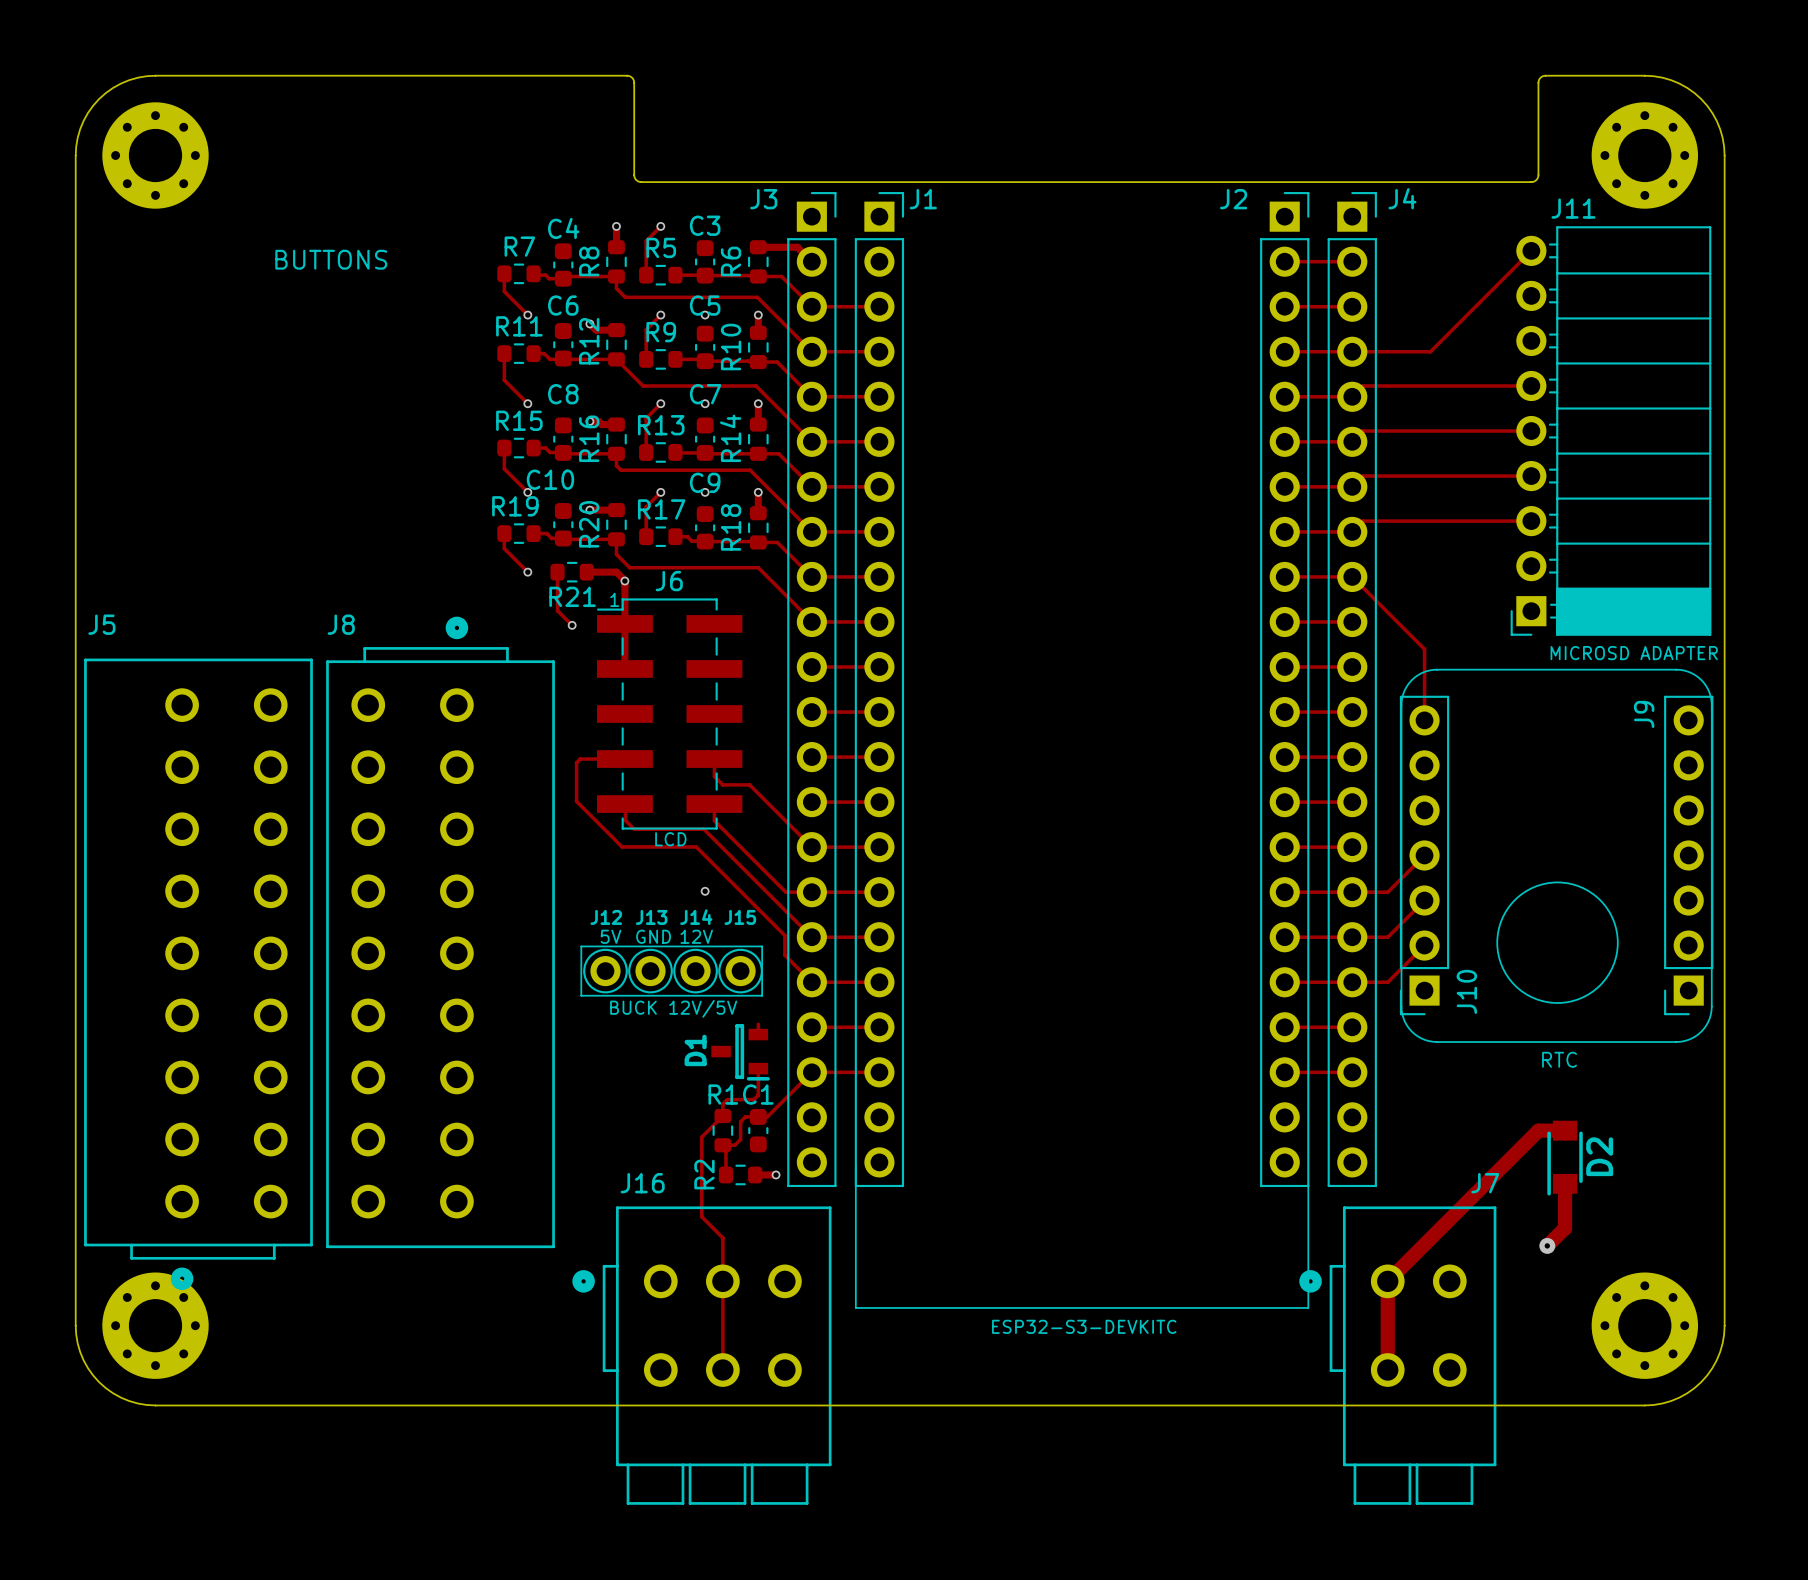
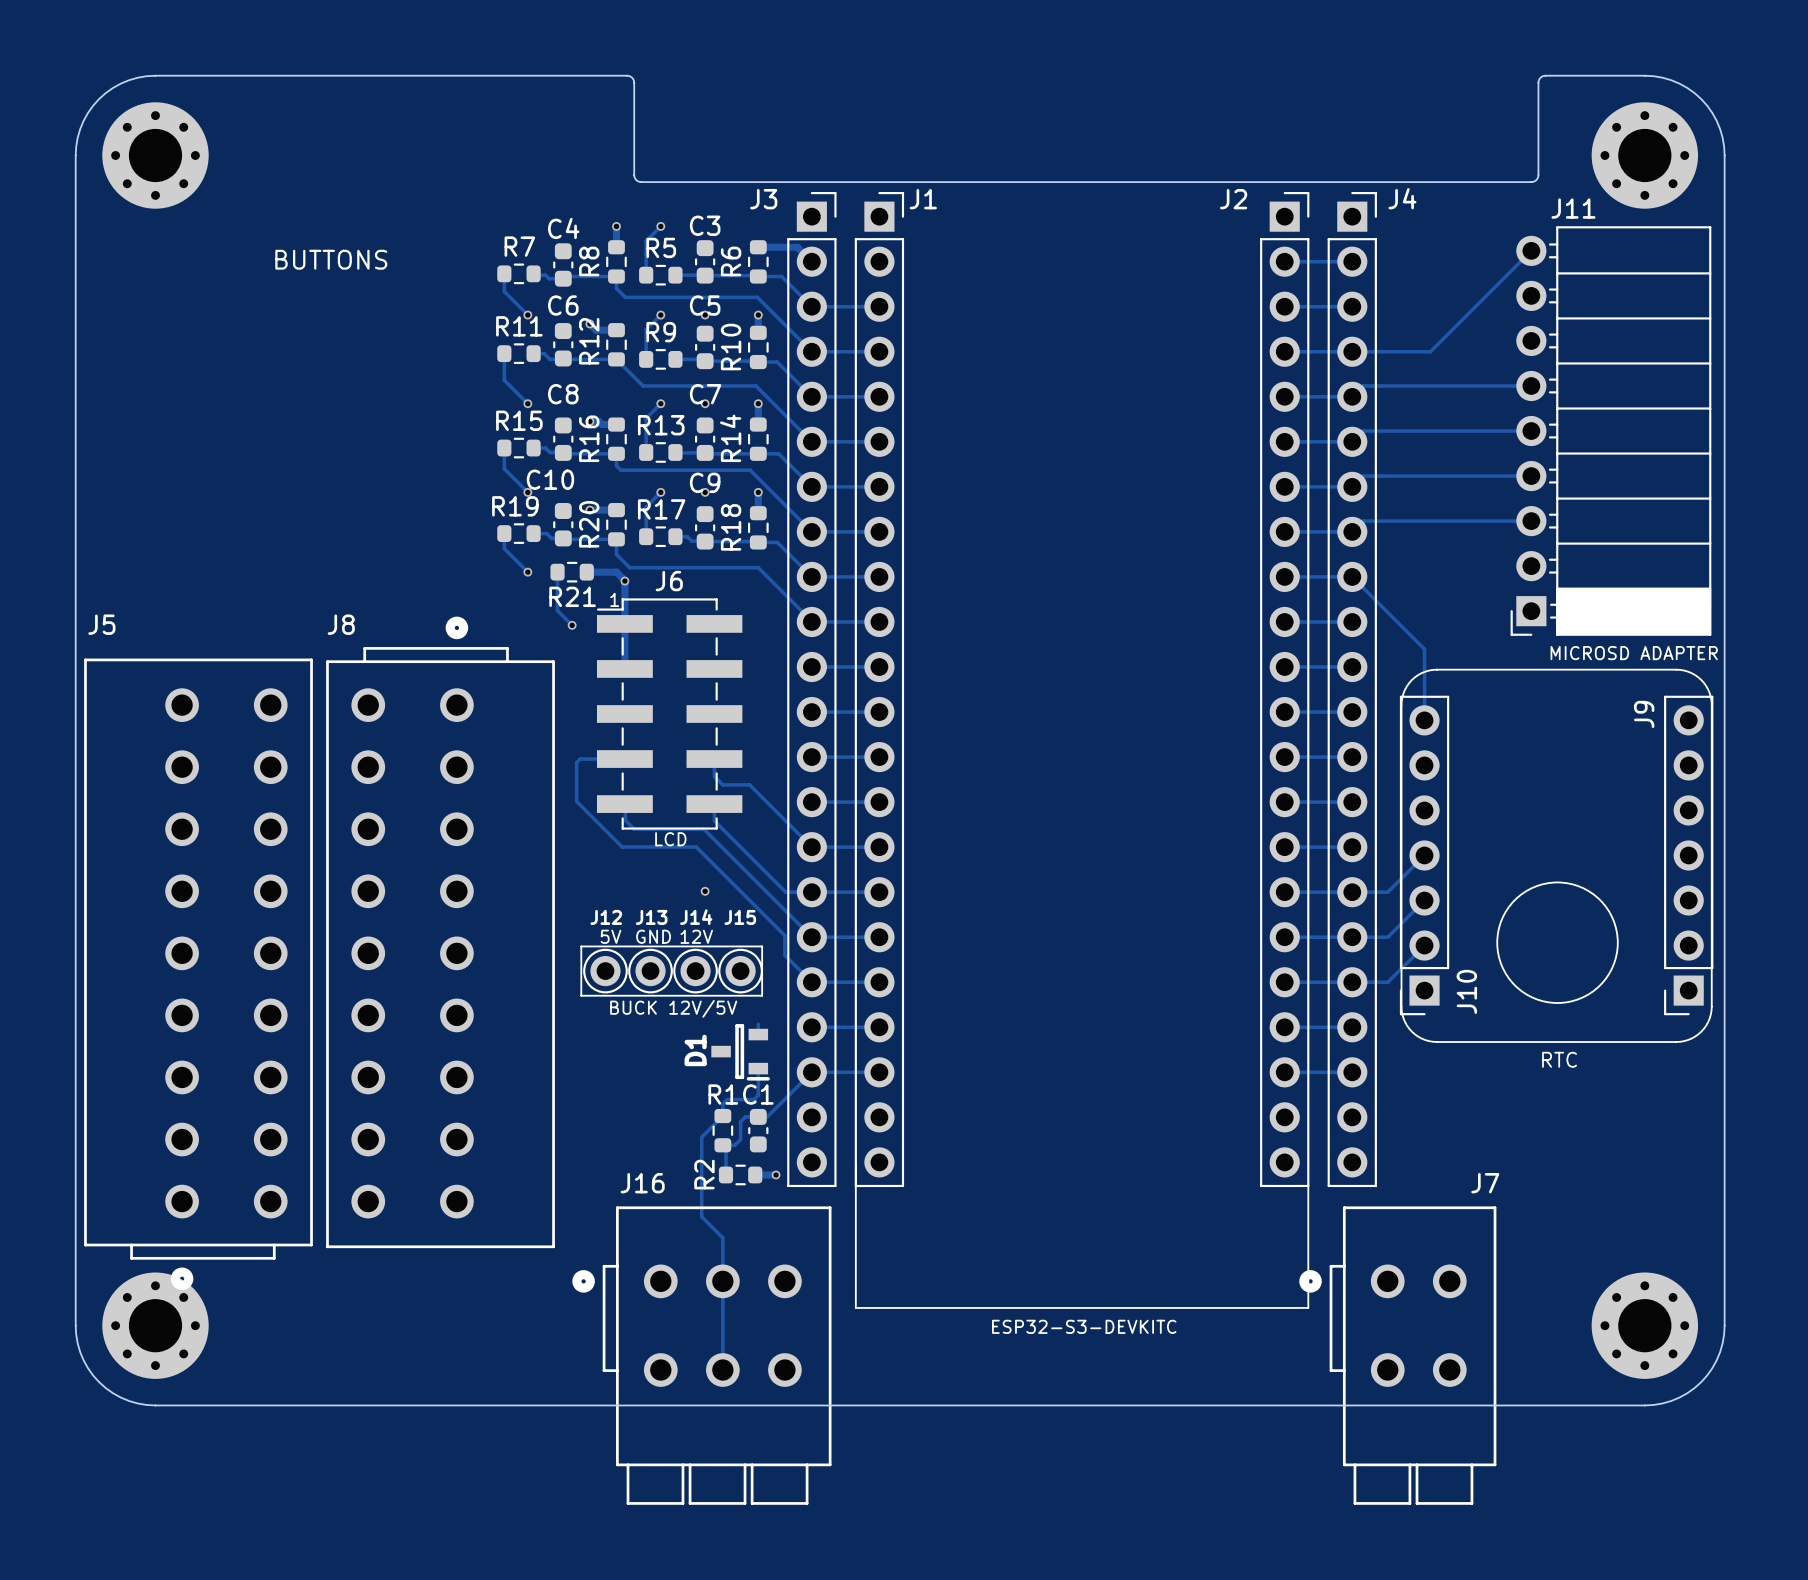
track: (1565, 1130) (1538, 1130) (1387, 1281) (1387, 1370) -> none
D2: (1565, 1158) -> none
track: (1565, 1183) (1565, 1228) (1547, 1245) -> none
via: (1547, 1245) -> none

